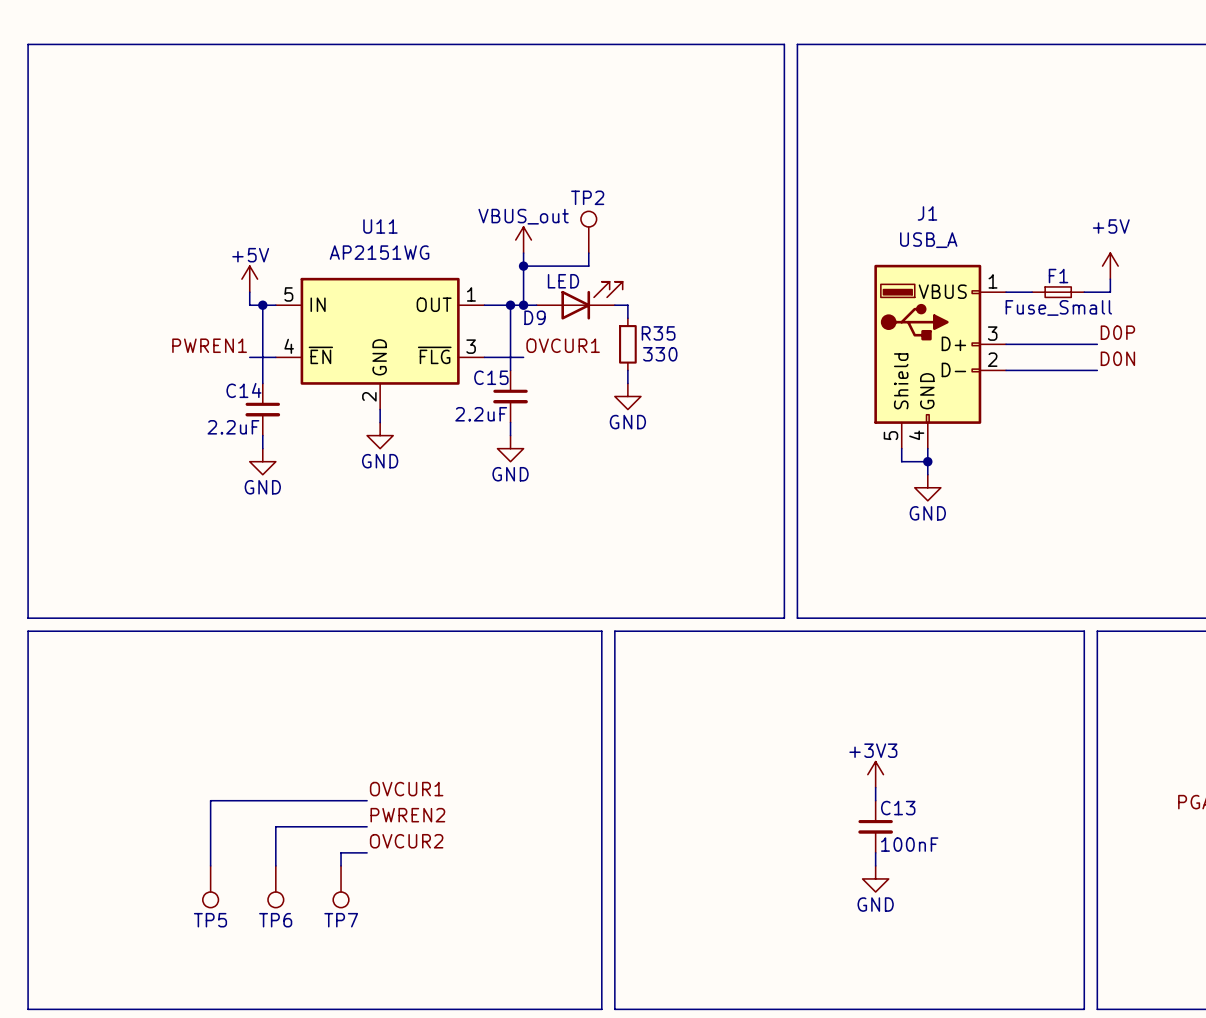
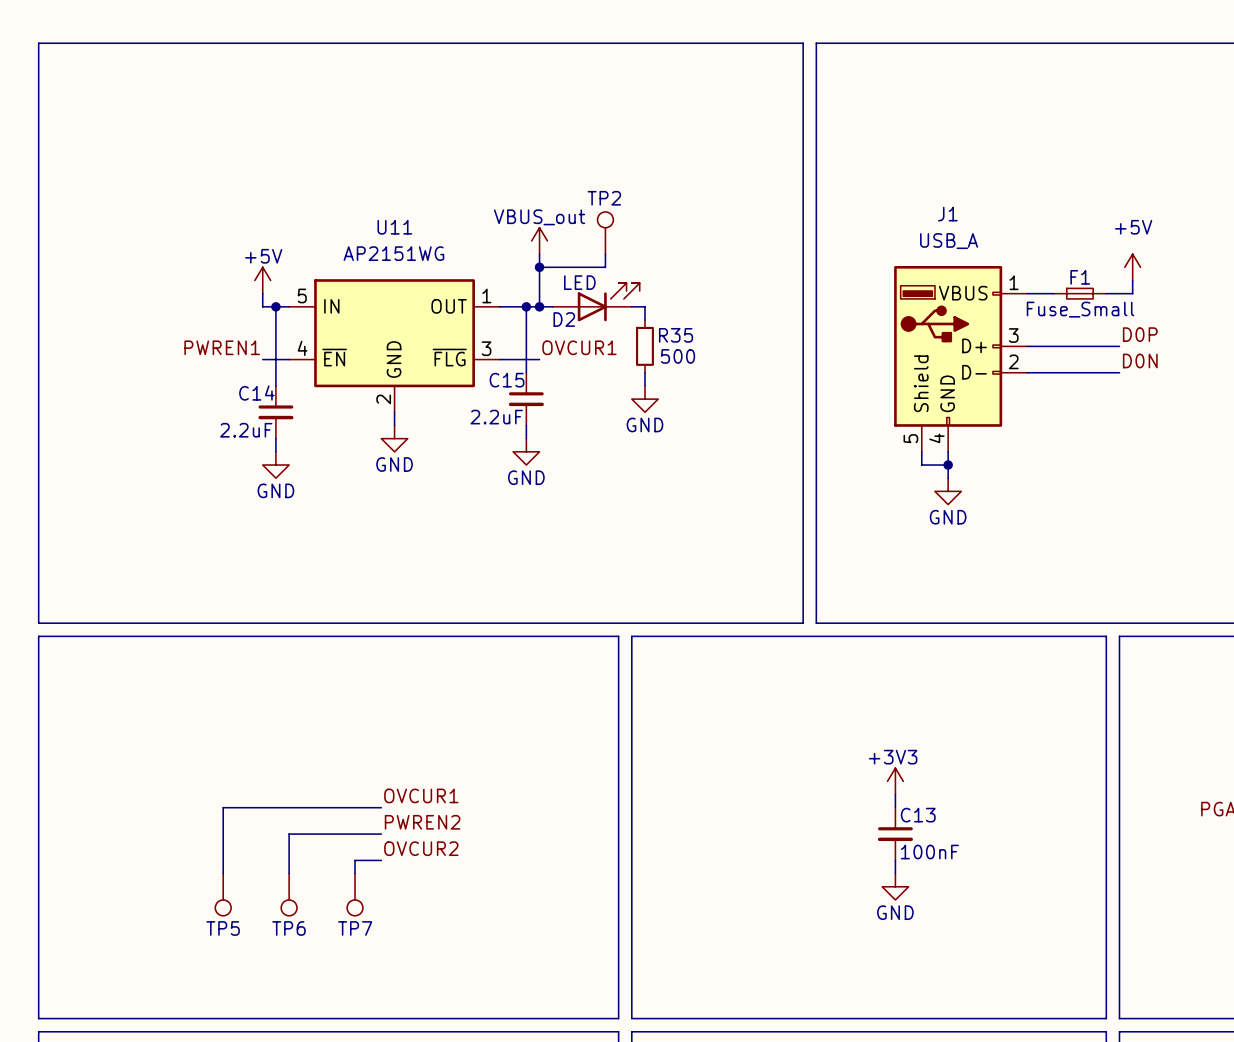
D9 name: D9 (535, 317) -> D2 (564, 319)
R35 value: 330 (660, 354) -> 500 (678, 356)

